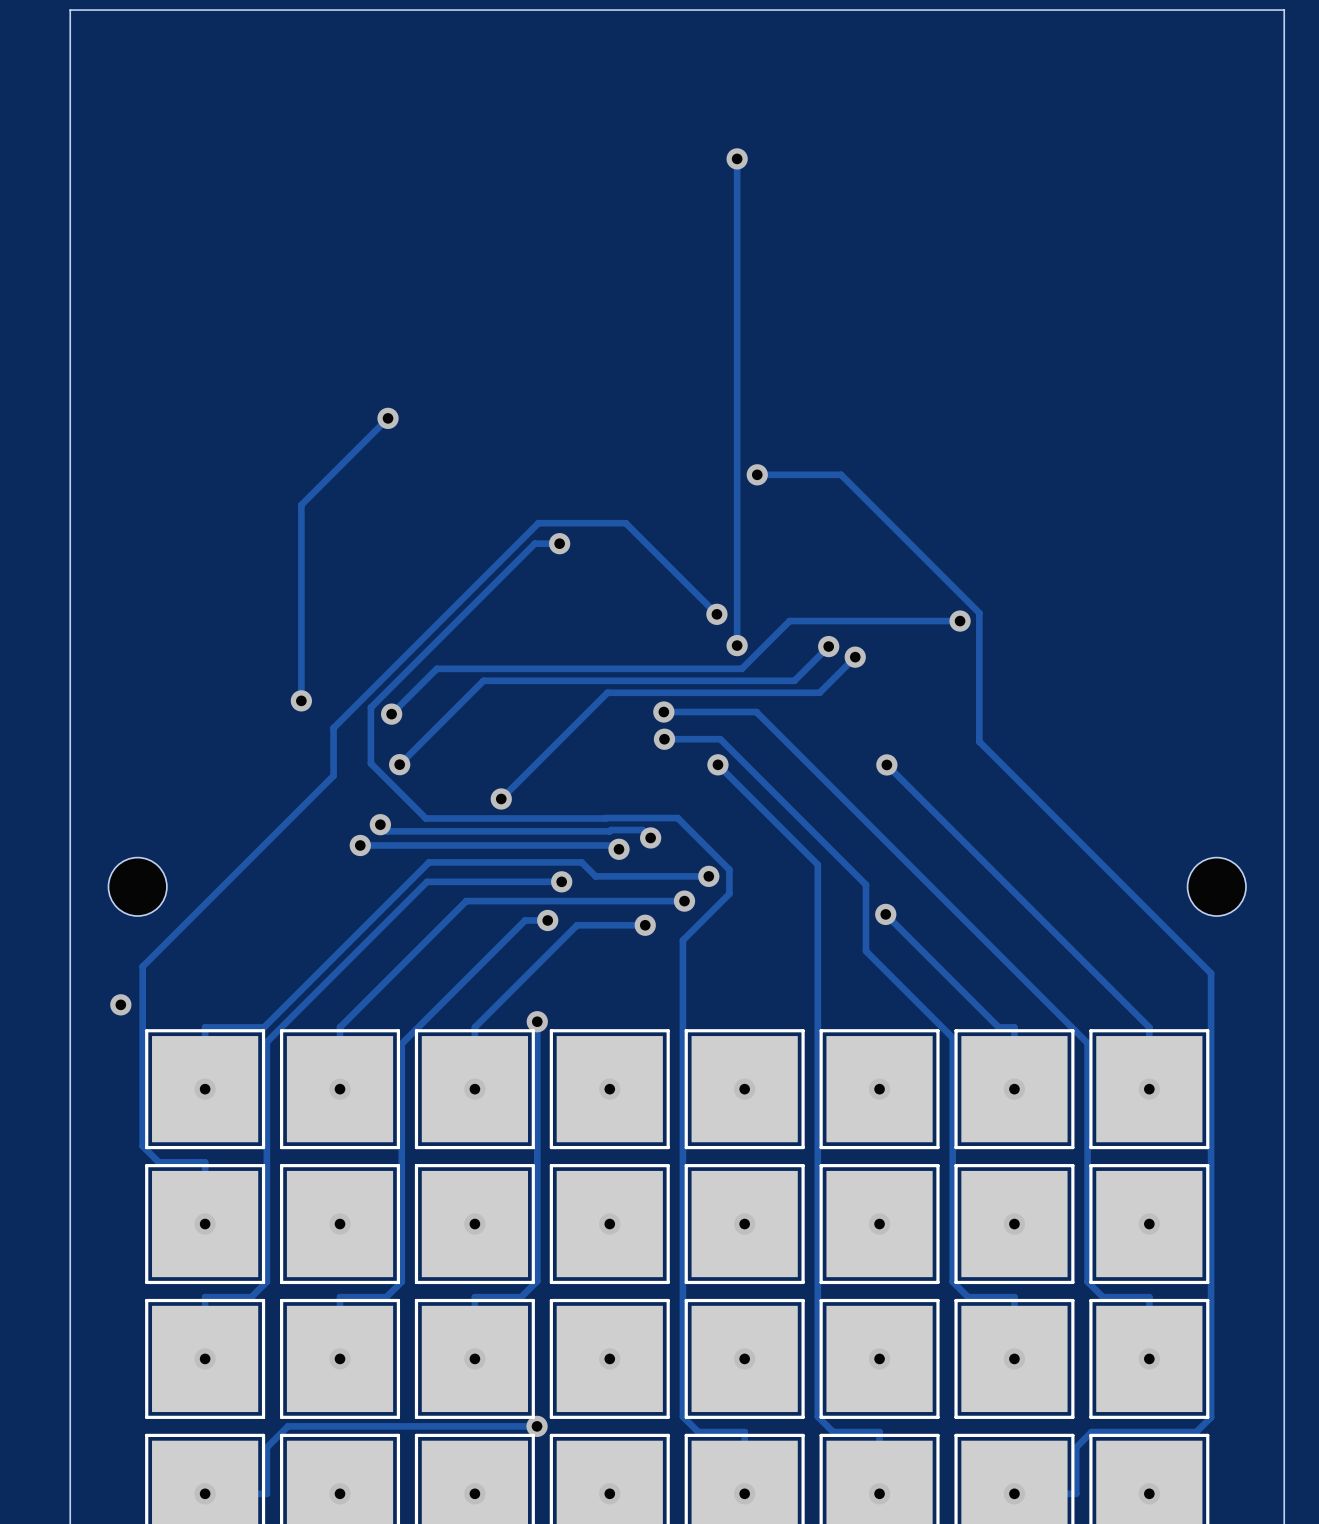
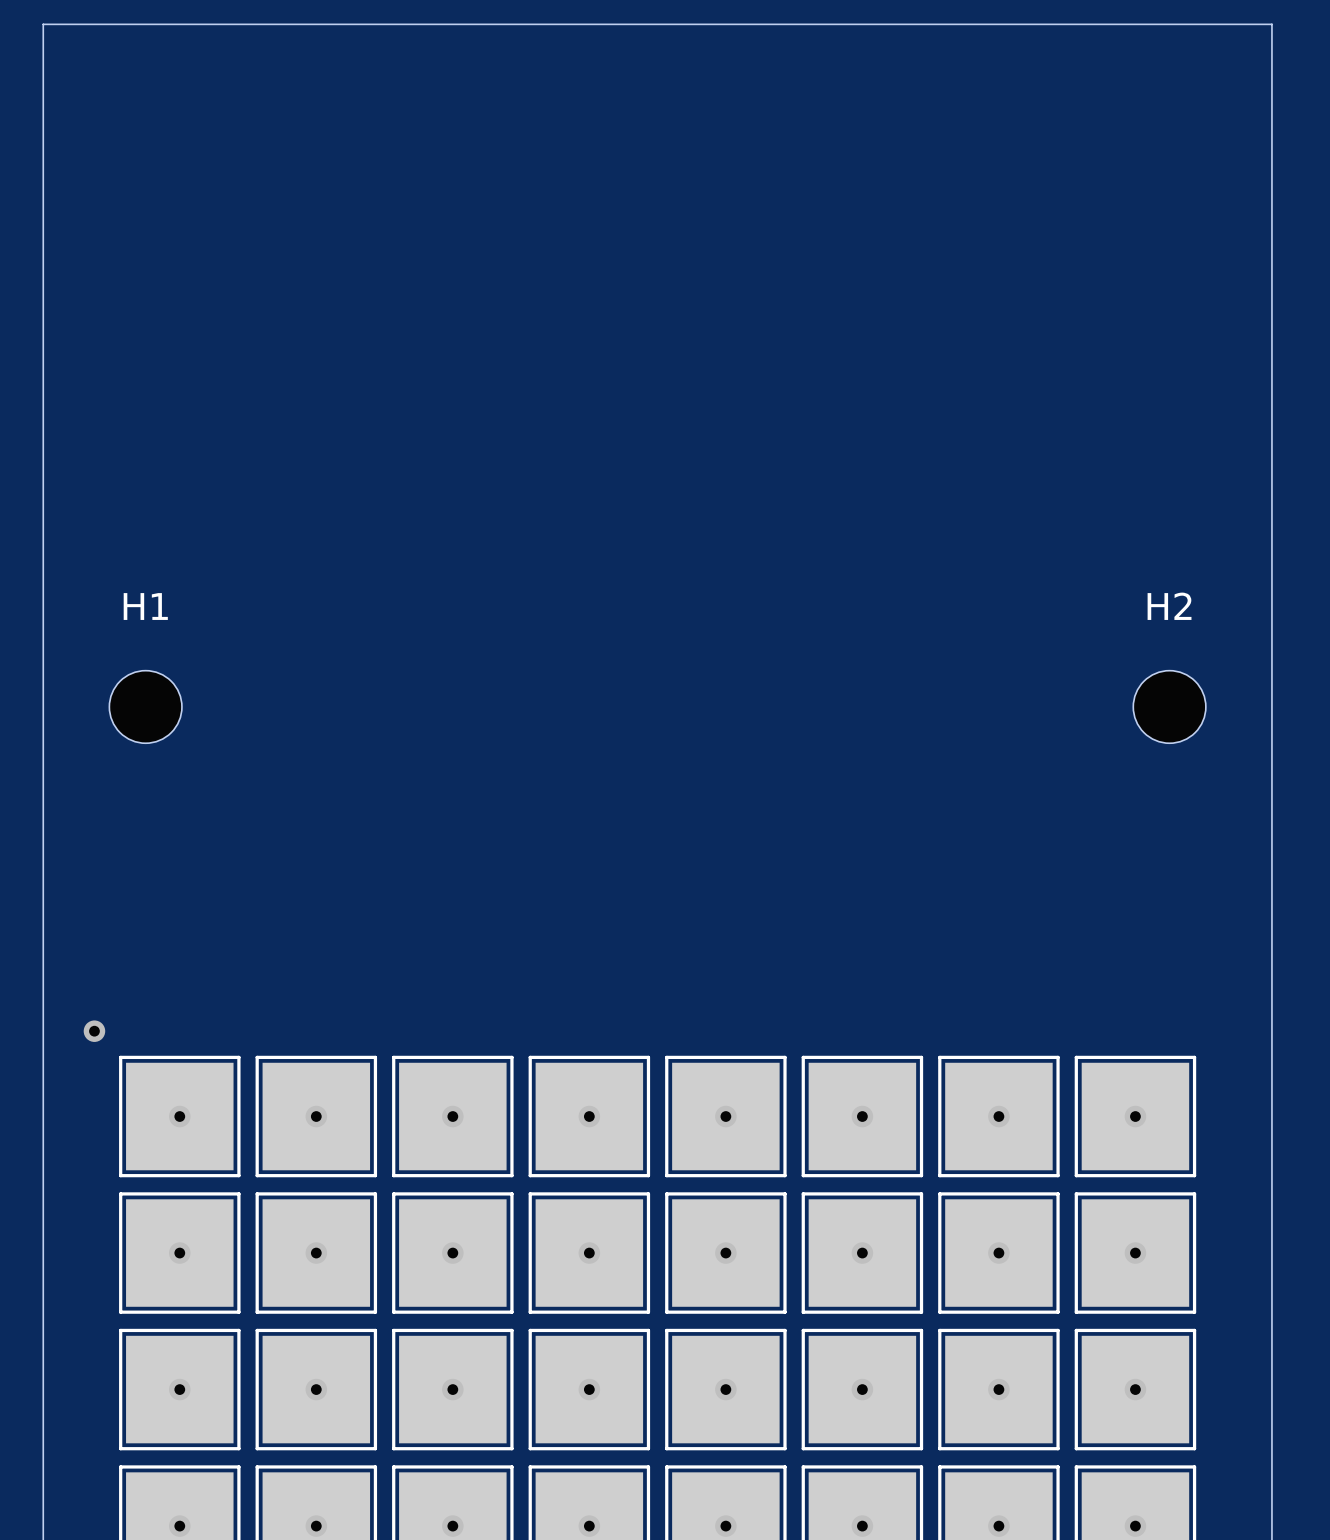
track: (737, 158) (737, 645) -> none
via: (737, 158) -> none
track: (388, 418) (301, 505) (301, 700) -> none
via: (388, 418) -> none
track: (757, 474) (841, 474) (979, 613) (979, 741) (1211, 973) (1211, 1417) (1196, 1432) (1091, 1432) (1076, 1447) (1076, 1493) (1014, 1493) -> none
via: (757, 474) -> none
track: (559, 543) (534, 543) (370, 707) (370, 763) (425, 818) (677, 818) (729, 869) (729, 893) (682, 940) (682, 1416) (698, 1432) (744, 1432) (744, 1493) -> none
via: (559, 543) -> none
track: (716, 614) (625, 523) (538, 523) (333, 728) (333, 775) (142, 966) (142, 1146) (158, 1162) (205, 1162) (205, 1224) -> none
via: (716, 614) -> none
track: (960, 621) (789, 621) (741, 668) (436, 668) (391, 714) -> none
via: (960, 621) -> none
via: (737, 645) -> none
track: (828, 646) (794, 680) (483, 680) (399, 764) -> none
via: (828, 646) -> none
track: (855, 657) (819, 692) (607, 692) (501, 798) -> none
via: (855, 657) -> none
H1: none -> (145, 706)
H2: none -> (1169, 706)
via: (301, 700) -> none
track: (663, 712) (756, 712) (1087, 1043) (1087, 1281) (1103, 1297) (1149, 1297) (1149, 1358) -> none
via: (663, 712) -> none
via: (391, 714) -> none
track: (664, 739) (720, 739) (865, 884) (865, 951) (952, 1037) (952, 1281) (968, 1297) (1014, 1297) (1014, 1358) -> none
via: (664, 739) -> none
via: (399, 764) -> none
track: (717, 764) (817, 864) (817, 1416) (833, 1432) (879, 1432) (879, 1493) -> none
via: (717, 764) -> none
track: (886, 764) (1149, 1027) (1149, 1089) -> none
via: (886, 764) -> none
via: (501, 798) -> none
track: (380, 824) (387, 831) (642, 830) (650, 837) -> none
via: (380, 824) -> none
via: (650, 837) -> none
track: (360, 845) (615, 845) (619, 849) -> none
via: (360, 845) -> none
via: (619, 849) -> none
track: (708, 876) (595, 876) (581, 862) (429, 862) (264, 1027) (205, 1027) (205, 1089) -> none
via: (708, 876) -> none
track: (561, 881) (427, 881) (266, 1042) (266, 1281) (251, 1297) (205, 1297) (205, 1358) -> none
via: (561, 881) -> none
part: (137, 886) -> none
part: (1216, 886) -> none
track: (684, 901) (466, 901) (340, 1027) (340, 1089) -> none
via: (684, 901) -> none
track: (885, 914) (998, 1027) (1014, 1027) (1014, 1089) -> none
via: (885, 914) -> none
track: (547, 920) (525, 920) (401, 1043) (401, 1281) (386, 1297) (340, 1297) (340, 1358) -> none
via: (547, 920) -> none
track: (645, 925) (577, 925) (474, 1027) (474, 1089) -> none
via: (645, 925) -> none
track: (537, 1021) (537, 1281) (521, 1297) (474, 1297) (474, 1358) -> none
via: (537, 1021) -> none
track: (537, 1426) (288, 1426) (266, 1447) (266, 1493) (205, 1493) -> none
via: (537, 1426) -> none

